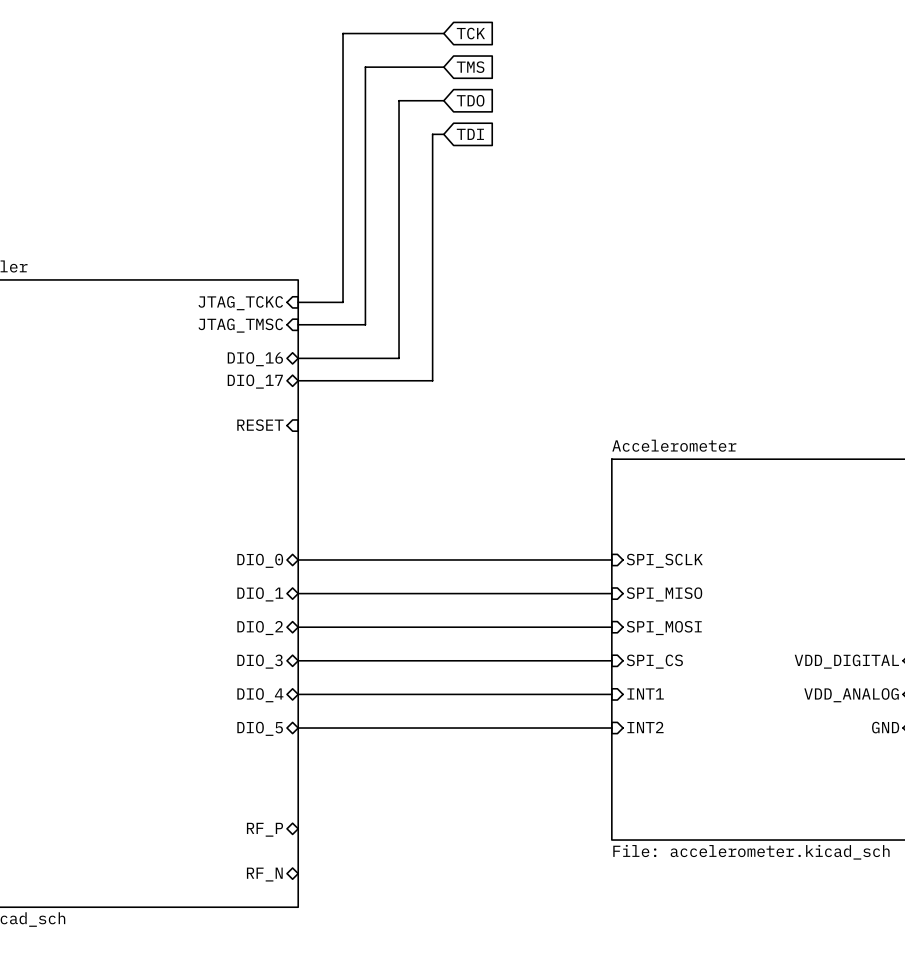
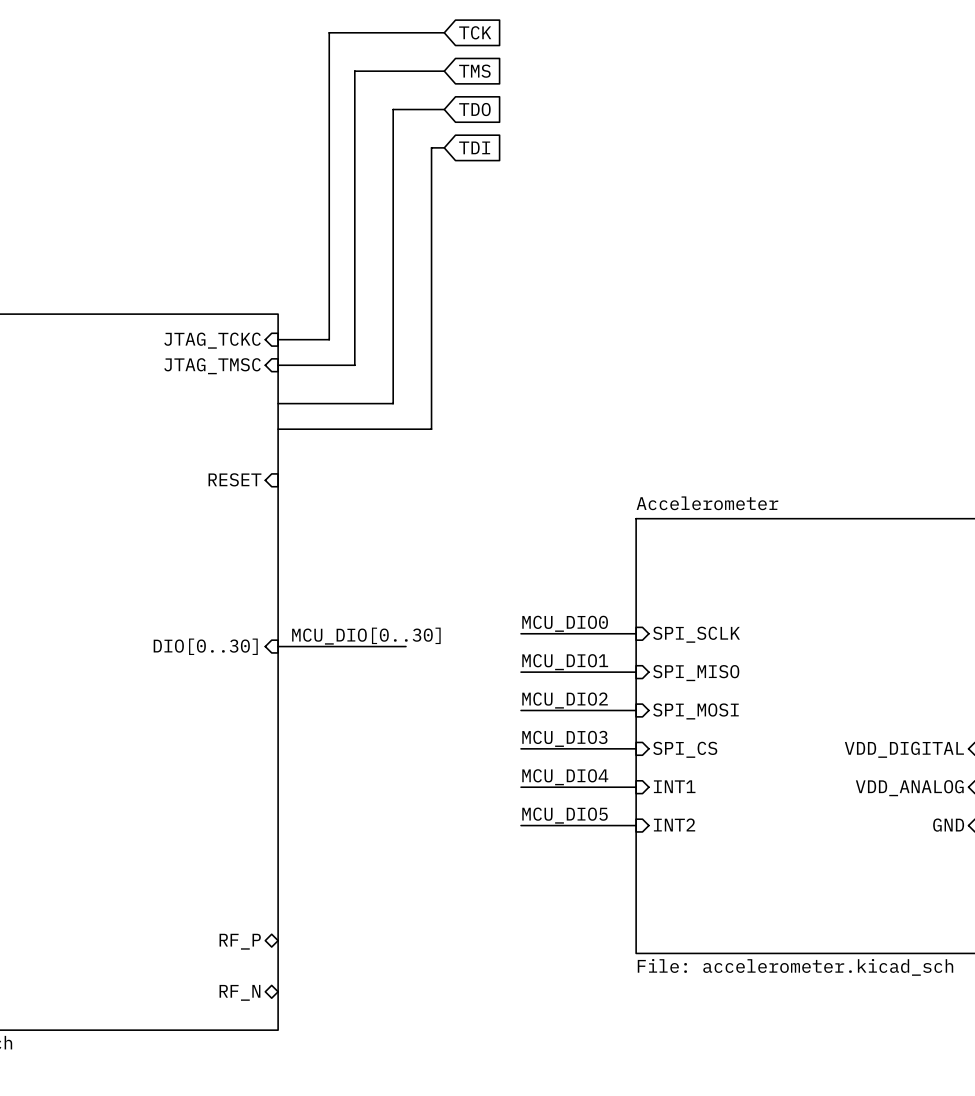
sheet pin: DIO_16 (255, 359) -> none
sheet pin: DIO_17 (255, 381) -> none
label: none -> MCU_DIO0 (565, 623)
wire: (298, 559) (511, 559) -> none
sheet pin: DIO_0 (260, 560) -> none
label: none -> MCU_DIO[0..30] (366, 636)
sheet pin: none -> DIO[0..30] (205, 646)
bus: none -> (278, 646) (405, 646)
label: none -> MCU_DIO1 (565, 662)
wire: (298, 593) (511, 593) -> none
sheet pin: DIO_1 (260, 594) -> none
label: none -> MCU_DIO2 (565, 700)
wire: (298, 627) (511, 627) -> none
sheet pin: DIO_2 (260, 628) -> none
label: none -> MCU_DIO3 (564, 738)
wire: (298, 660) (511, 660) -> none
sheet pin: DIO_3 (260, 661) -> none
label: none -> MCU_DIO4 (565, 777)
wire: (298, 694) (511, 694) -> none
sheet pin: DIO_4 (260, 695) -> none
label: none -> MCU_DIO5 (565, 815)
sheet pin: DIO_5 (260, 728) -> none
wire: (298, 728) (511, 728) -> none

